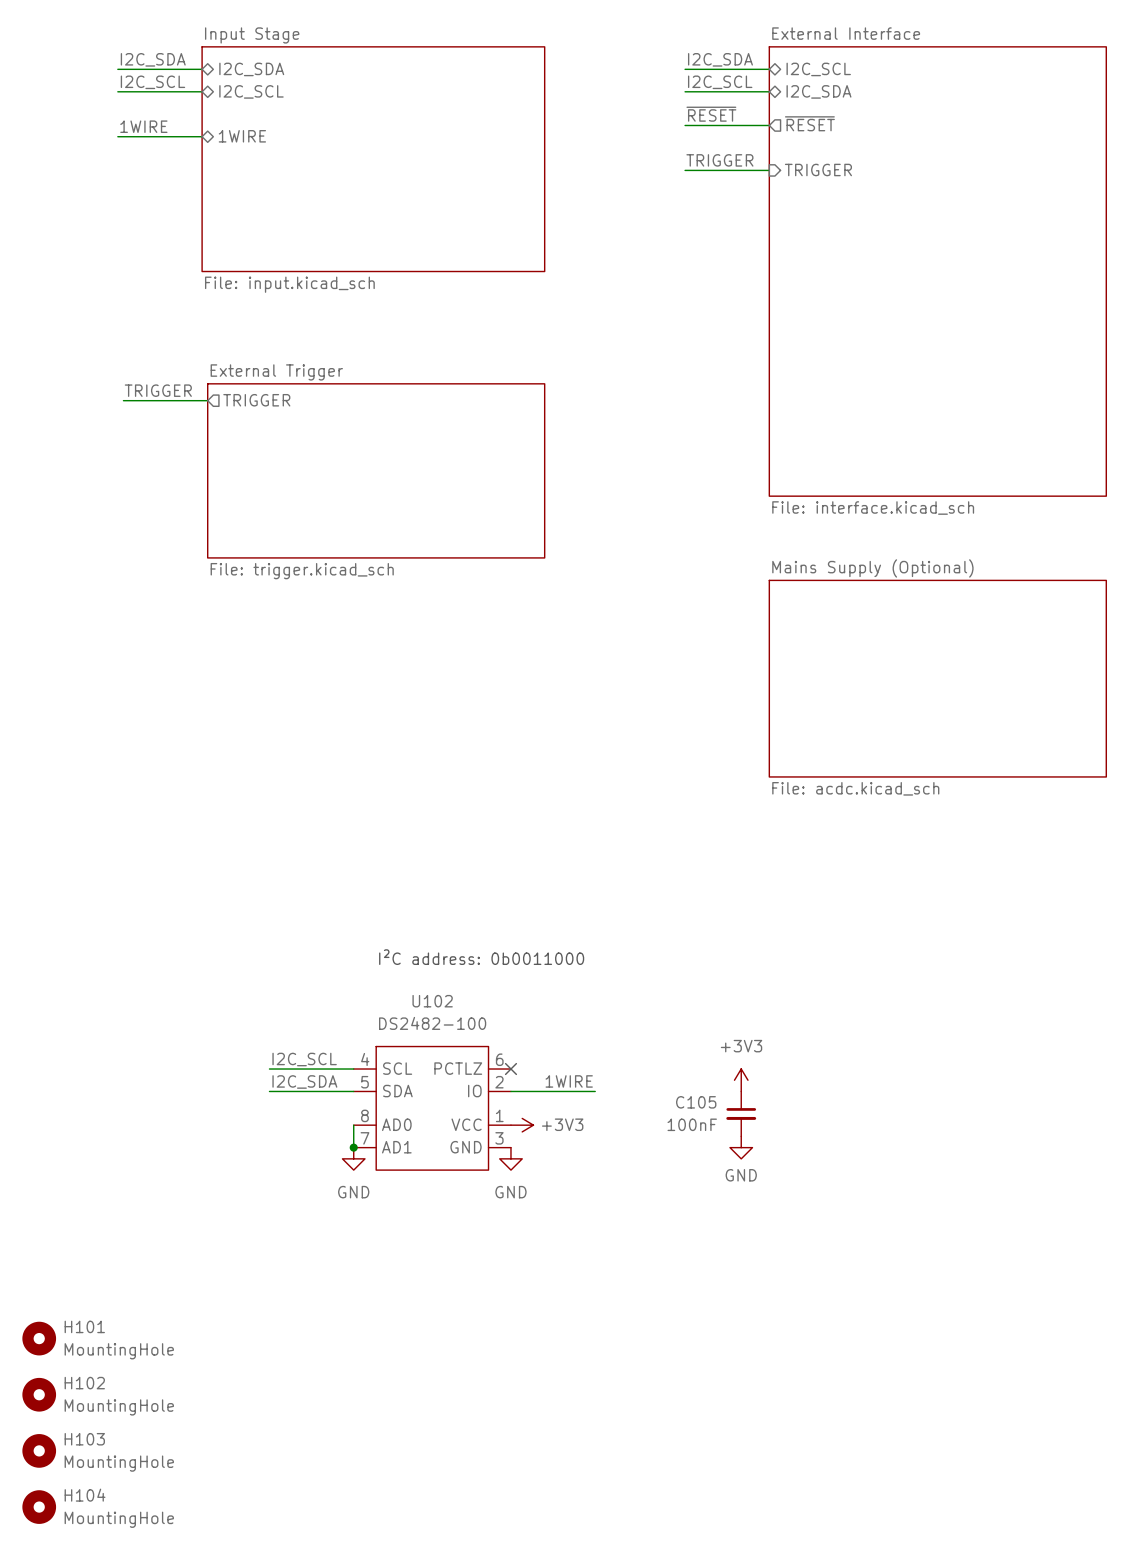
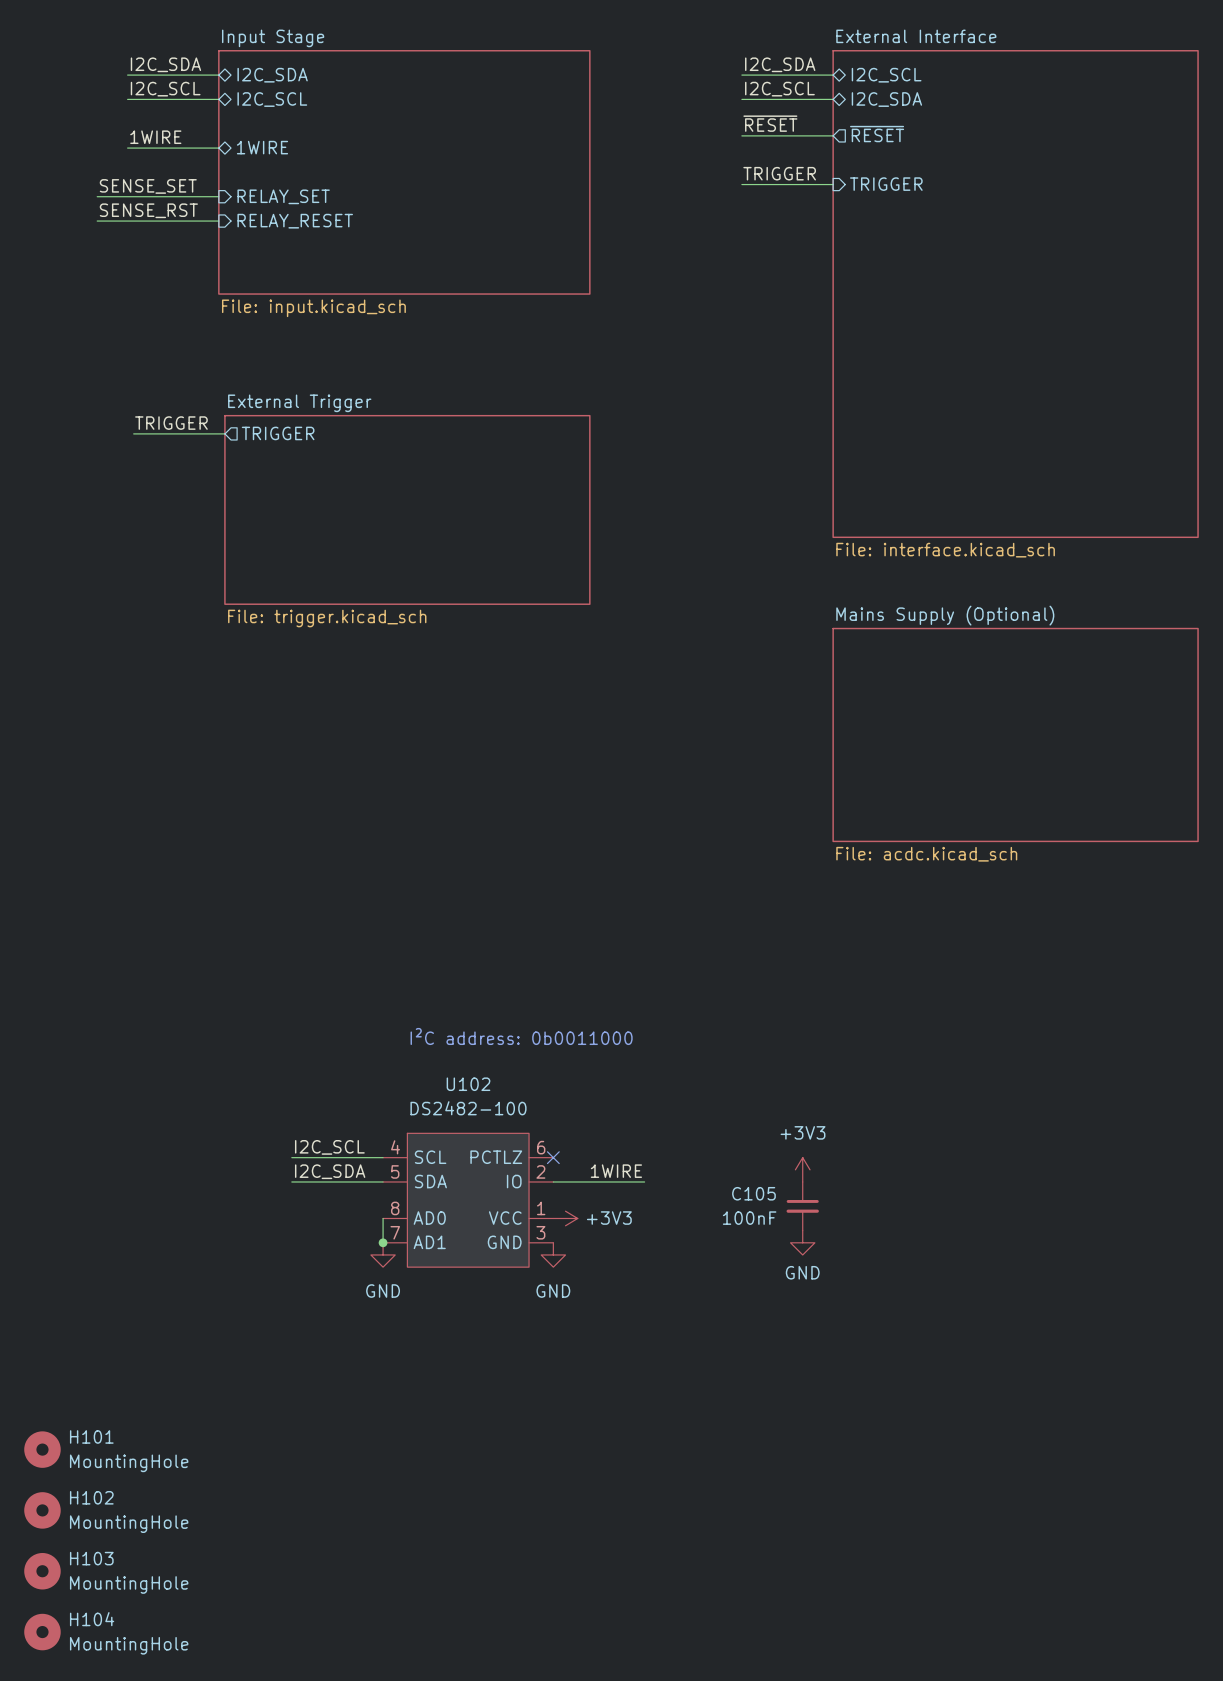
label: none -> SENSE_SET (148, 186)
wire: none -> (97, 196) (218, 196)
sheet pin: none -> RELAY_SET (283, 196)
label: none -> SENSE_RST (148, 210)
wire: none -> (97, 221) (218, 221)
sheet pin: none -> RELAY_RESET (295, 221)

